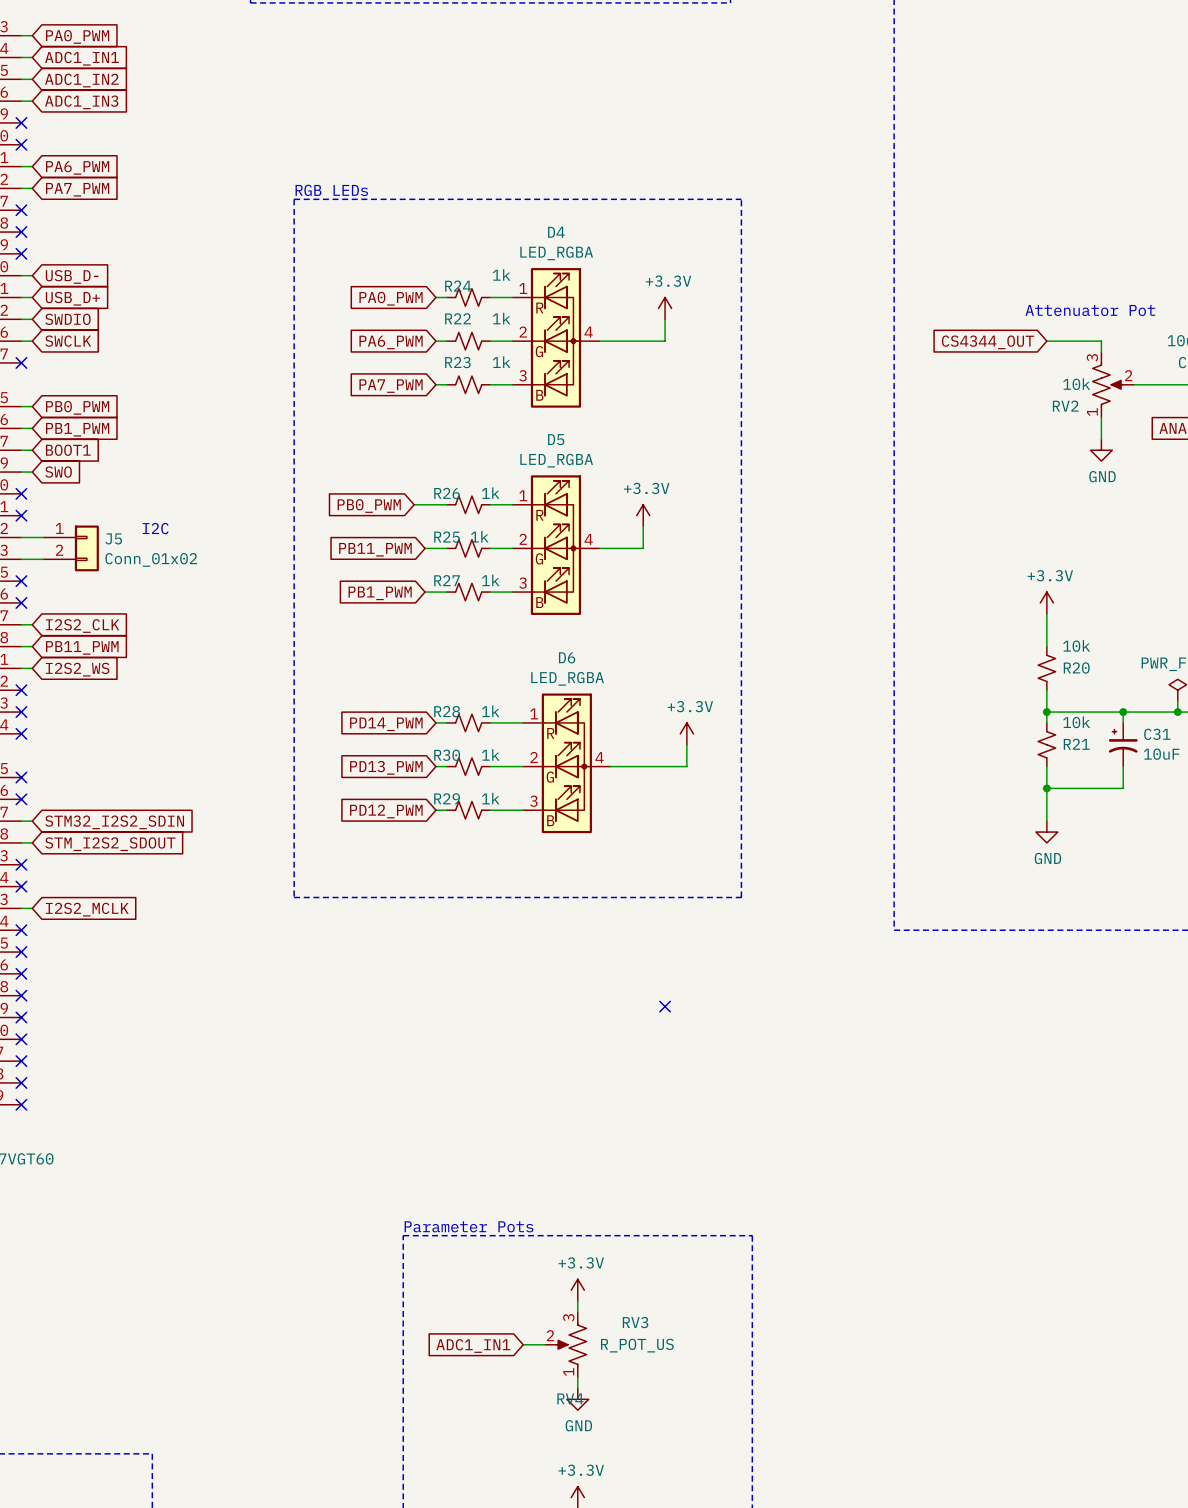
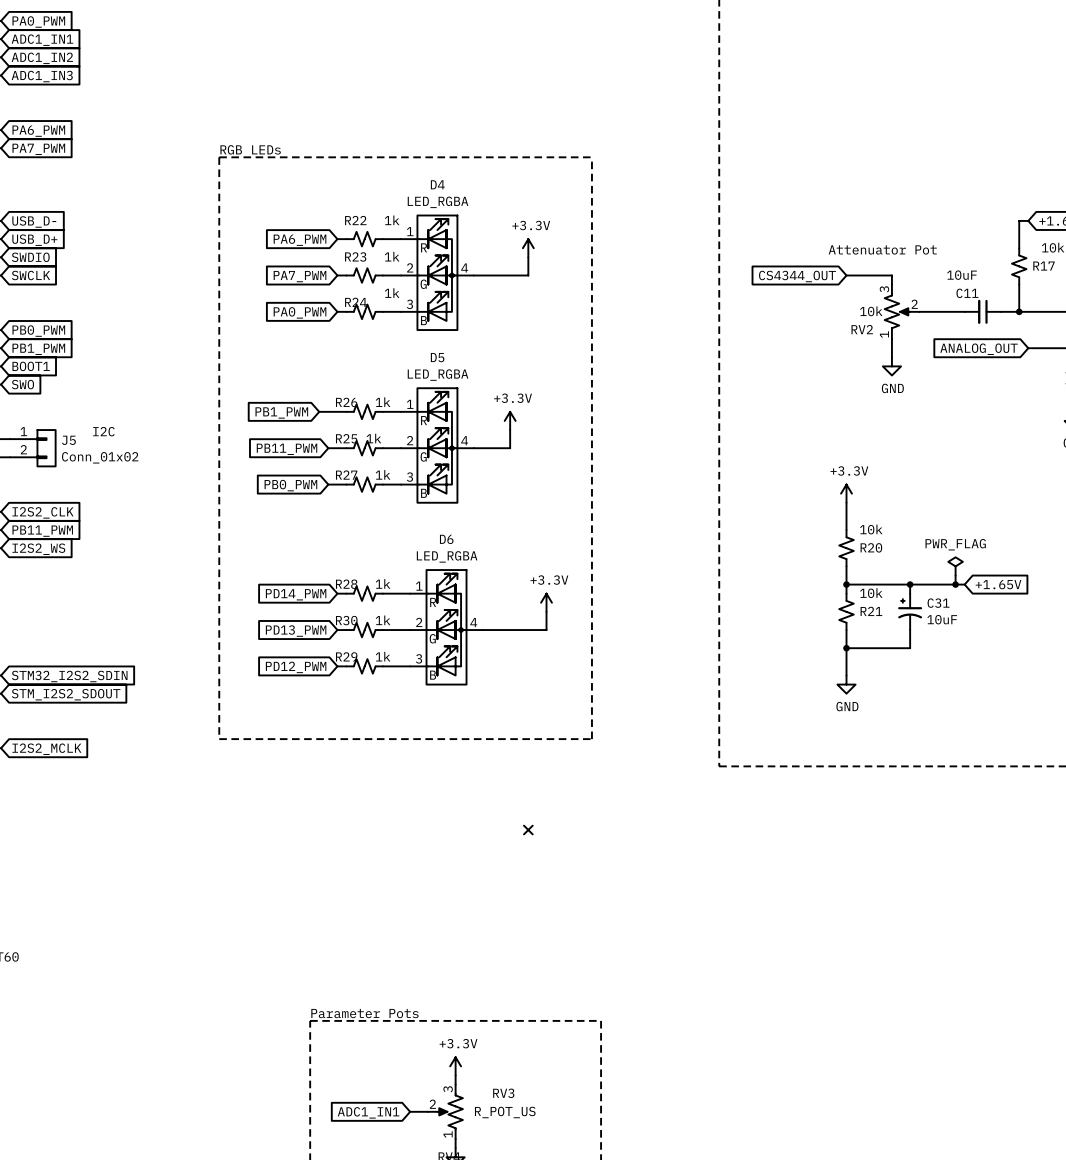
R24 name: R24 (458, 286) -> R22 (355, 220)
global label: PA0_PWM (391, 298) -> PA6_PWM (300, 240)
R22 name: R22 (457, 318) -> R23 (355, 256)
global label: PA6_PWM (391, 342) -> PA7_PWM (300, 276)
R23 name: R23 (457, 362) -> R24 (355, 302)
global label: PA7_PWM (391, 386) -> PA0_PWM (300, 312)
global label: PB0_PWM (369, 506) -> PB1_PWM (281, 412)
global label: PB1_PWM (380, 593) -> PB0_PWM (290, 485)

